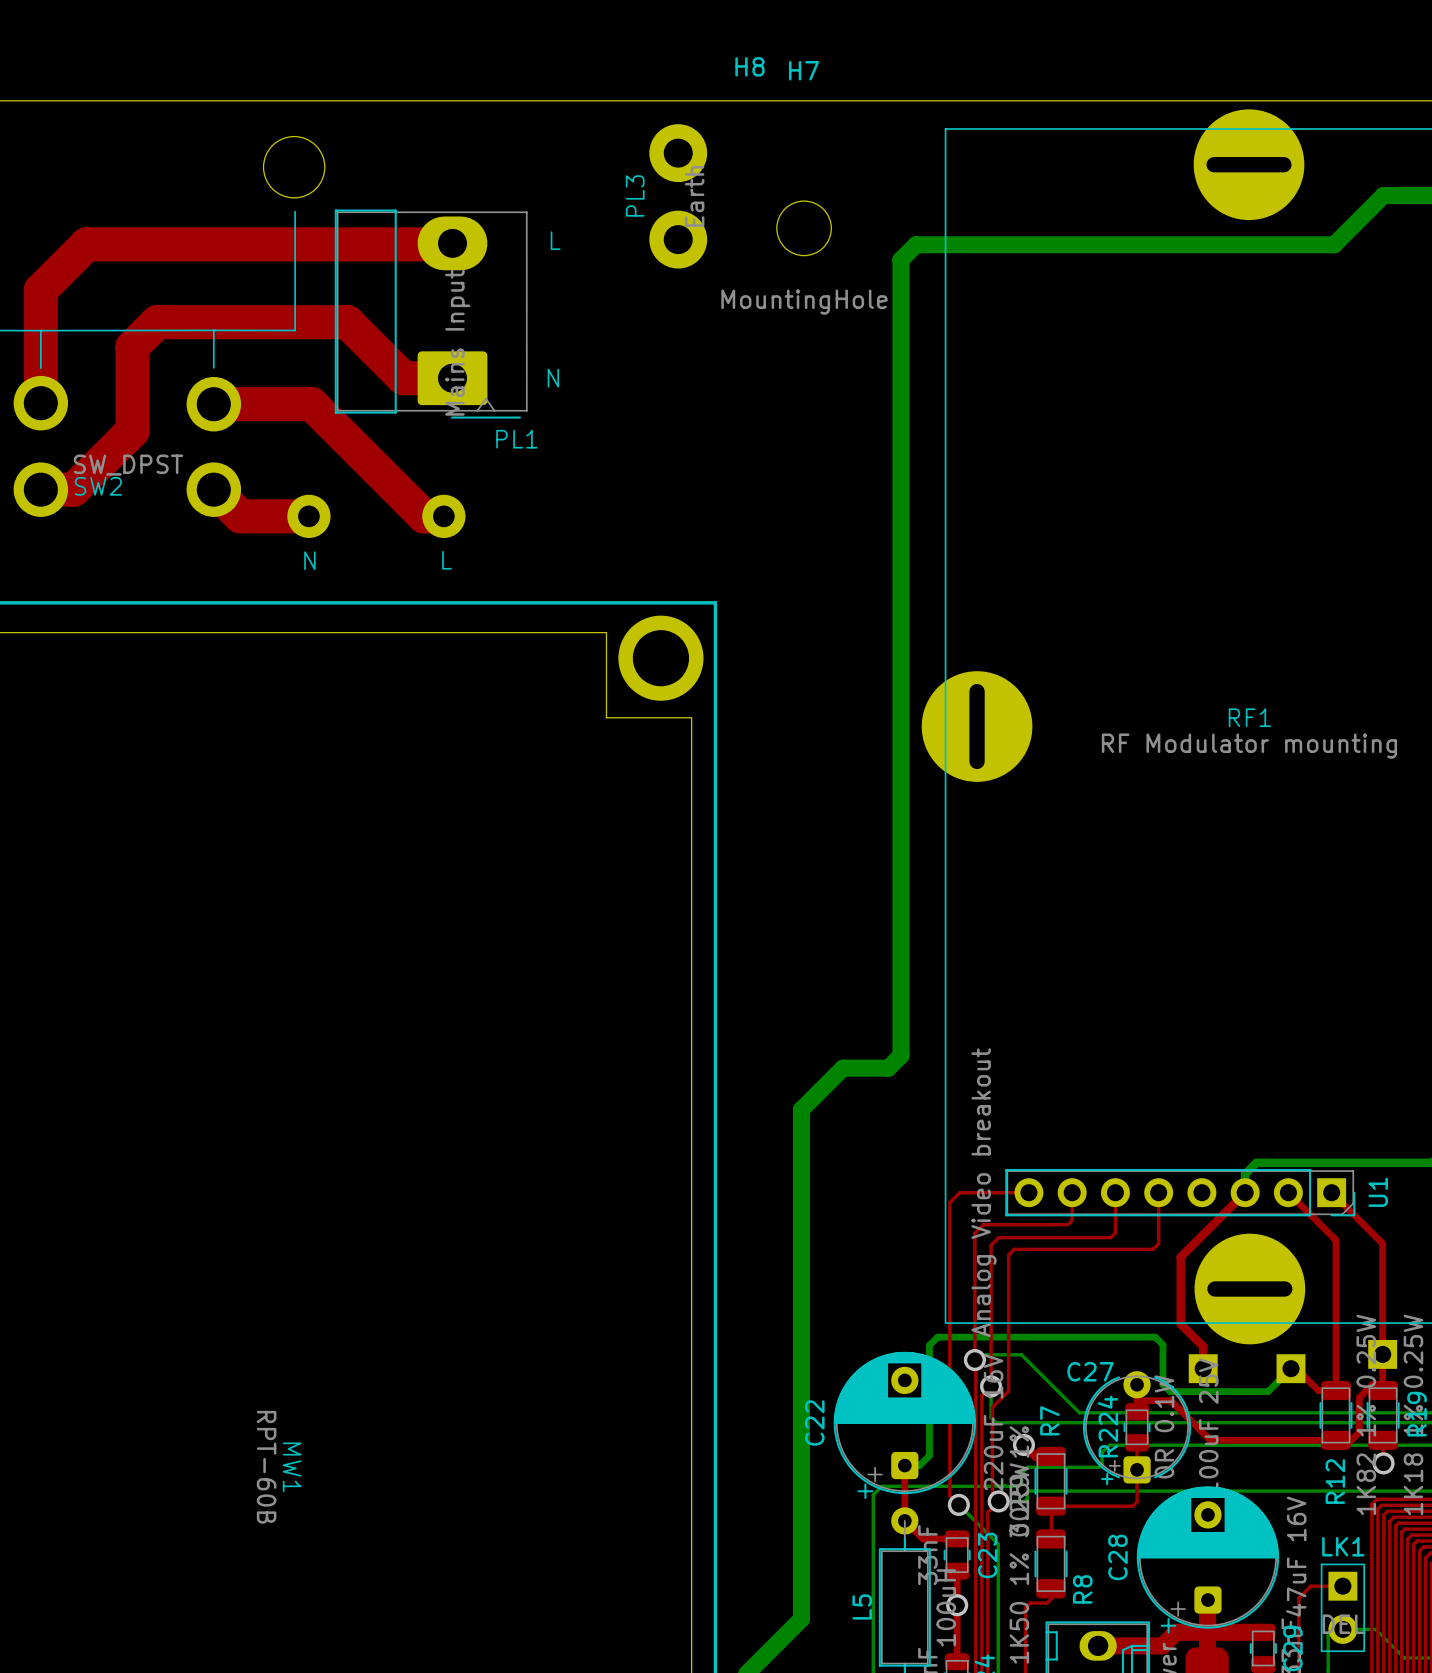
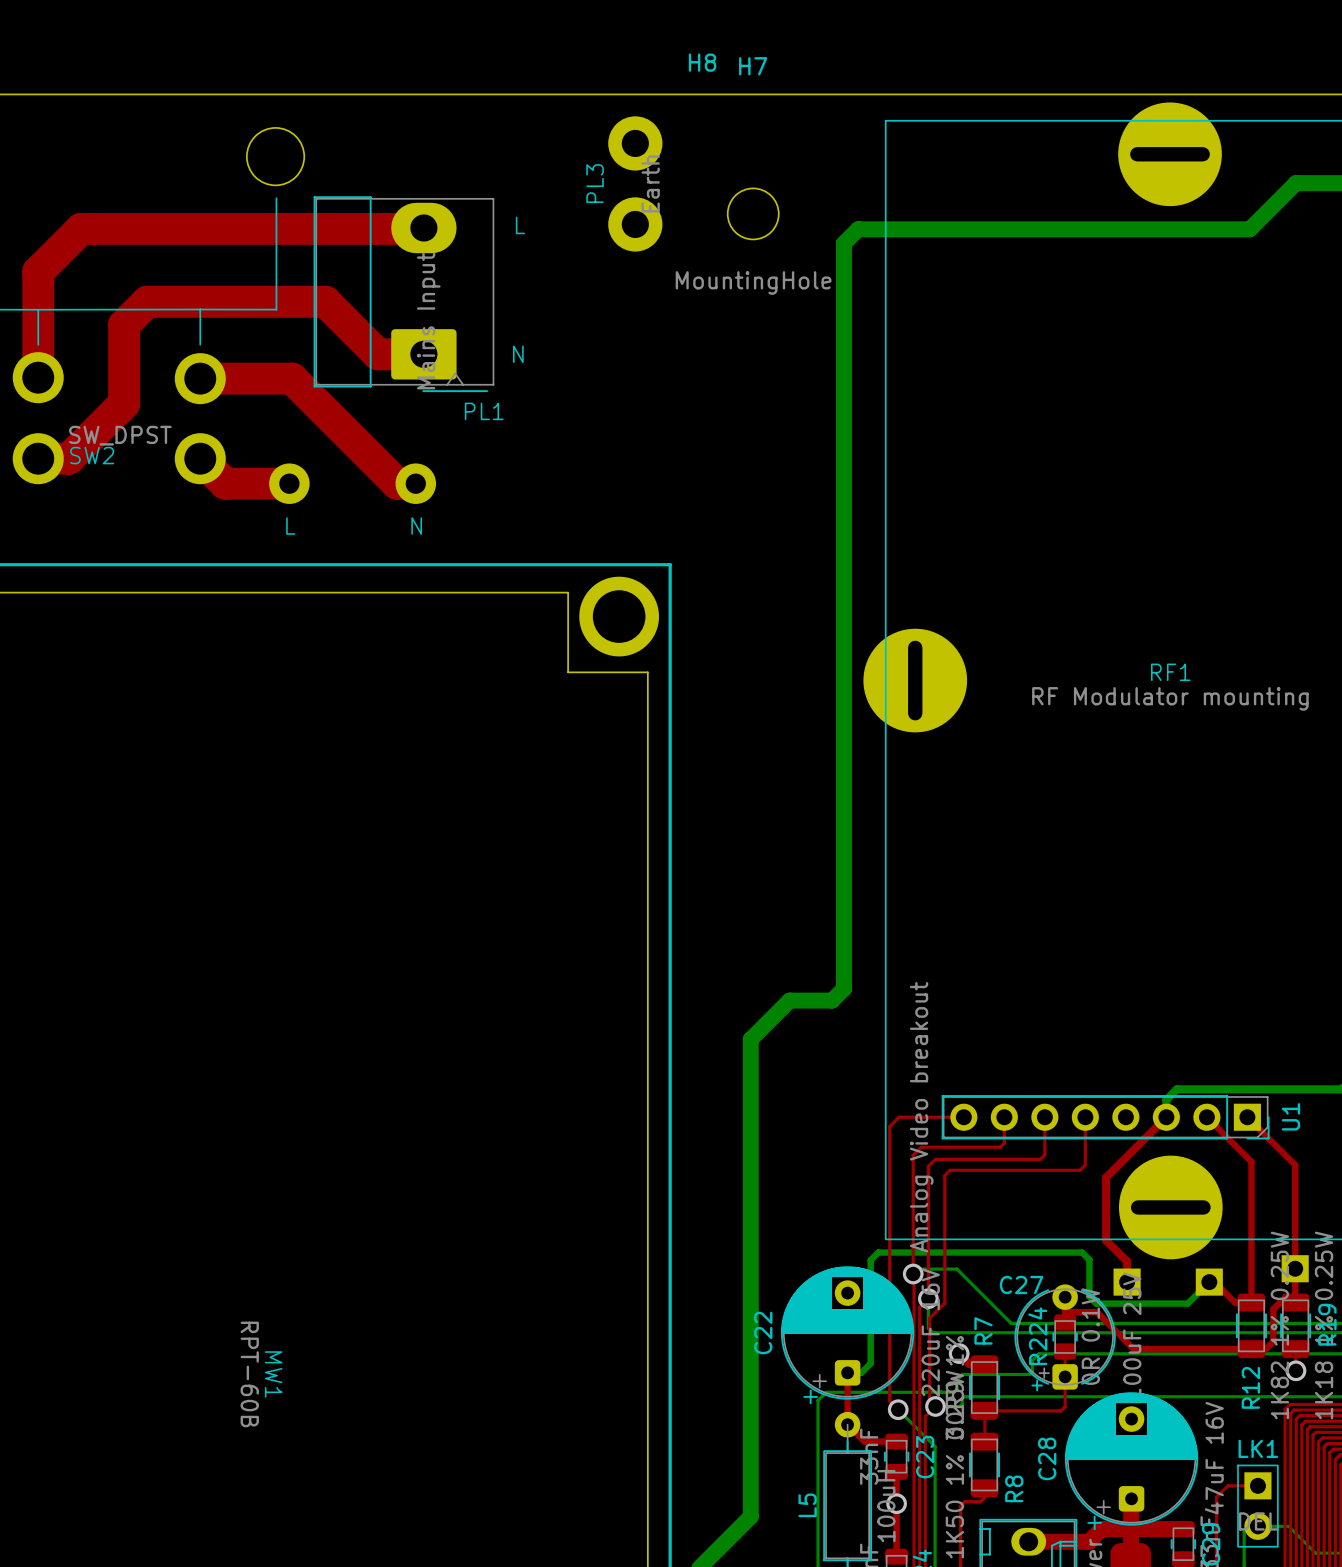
text: N (309, 560) -> L (290, 526)
text: L (447, 560) -> N (416, 526)

